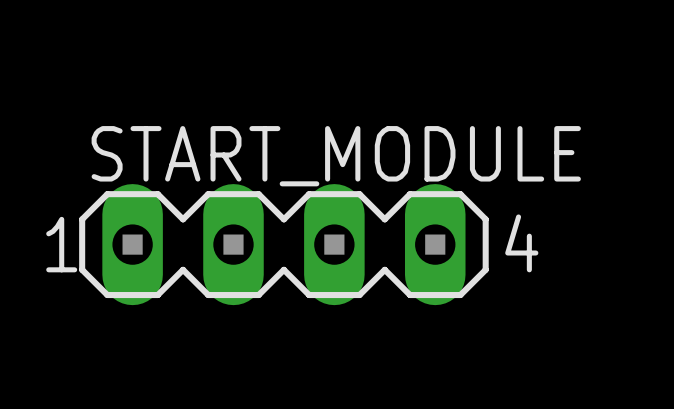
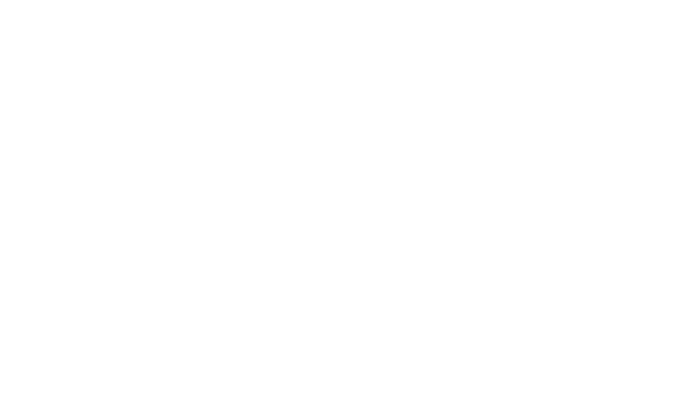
START_MODULE: (283, 244) -> none

